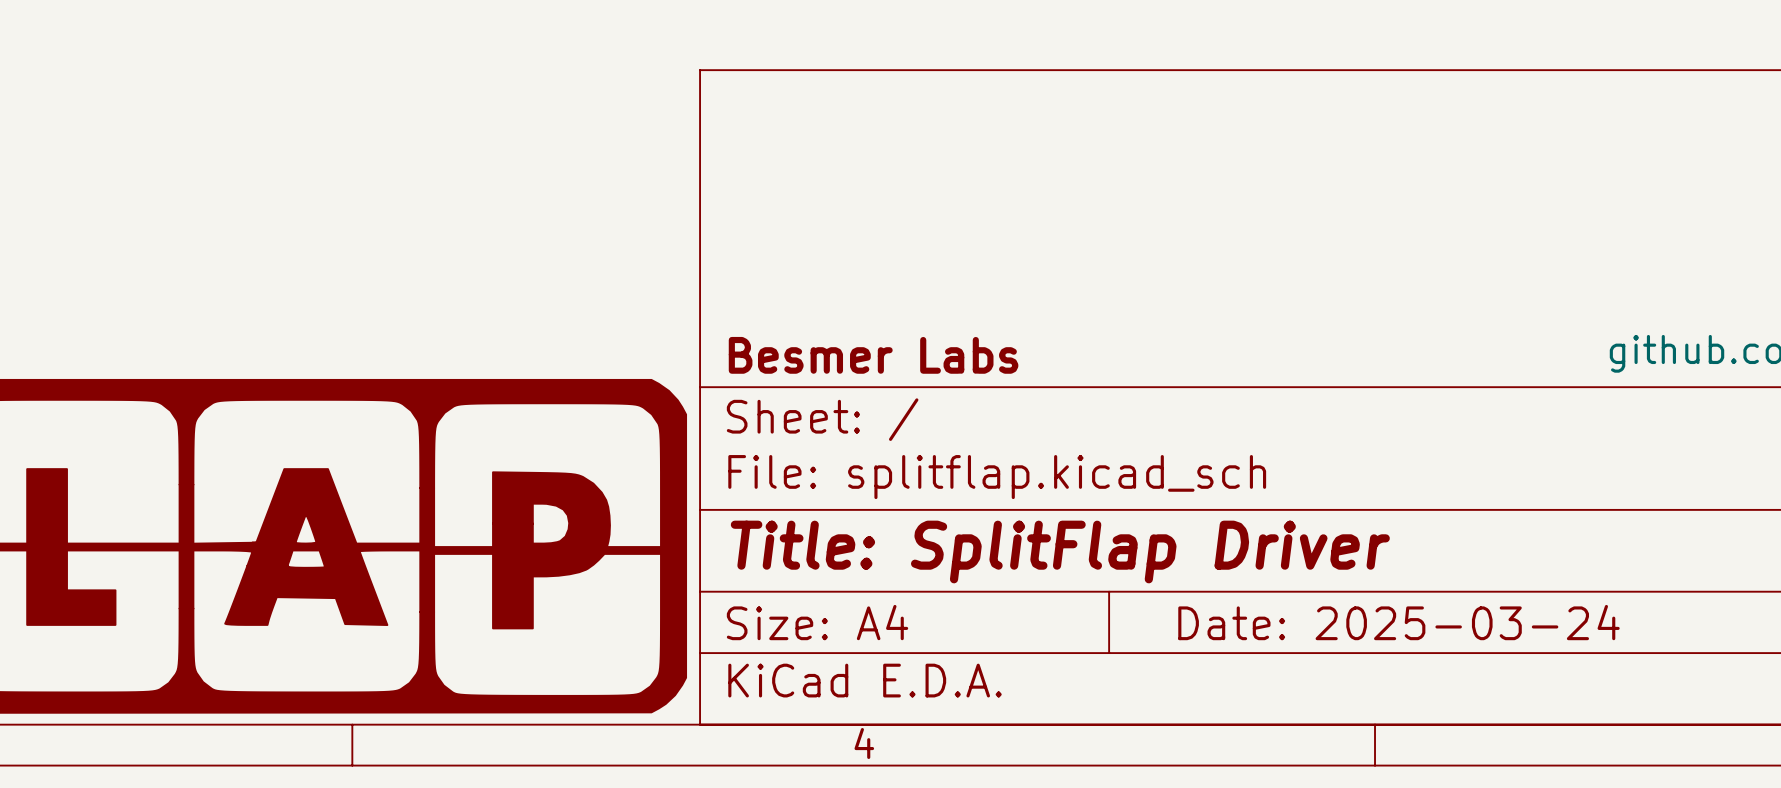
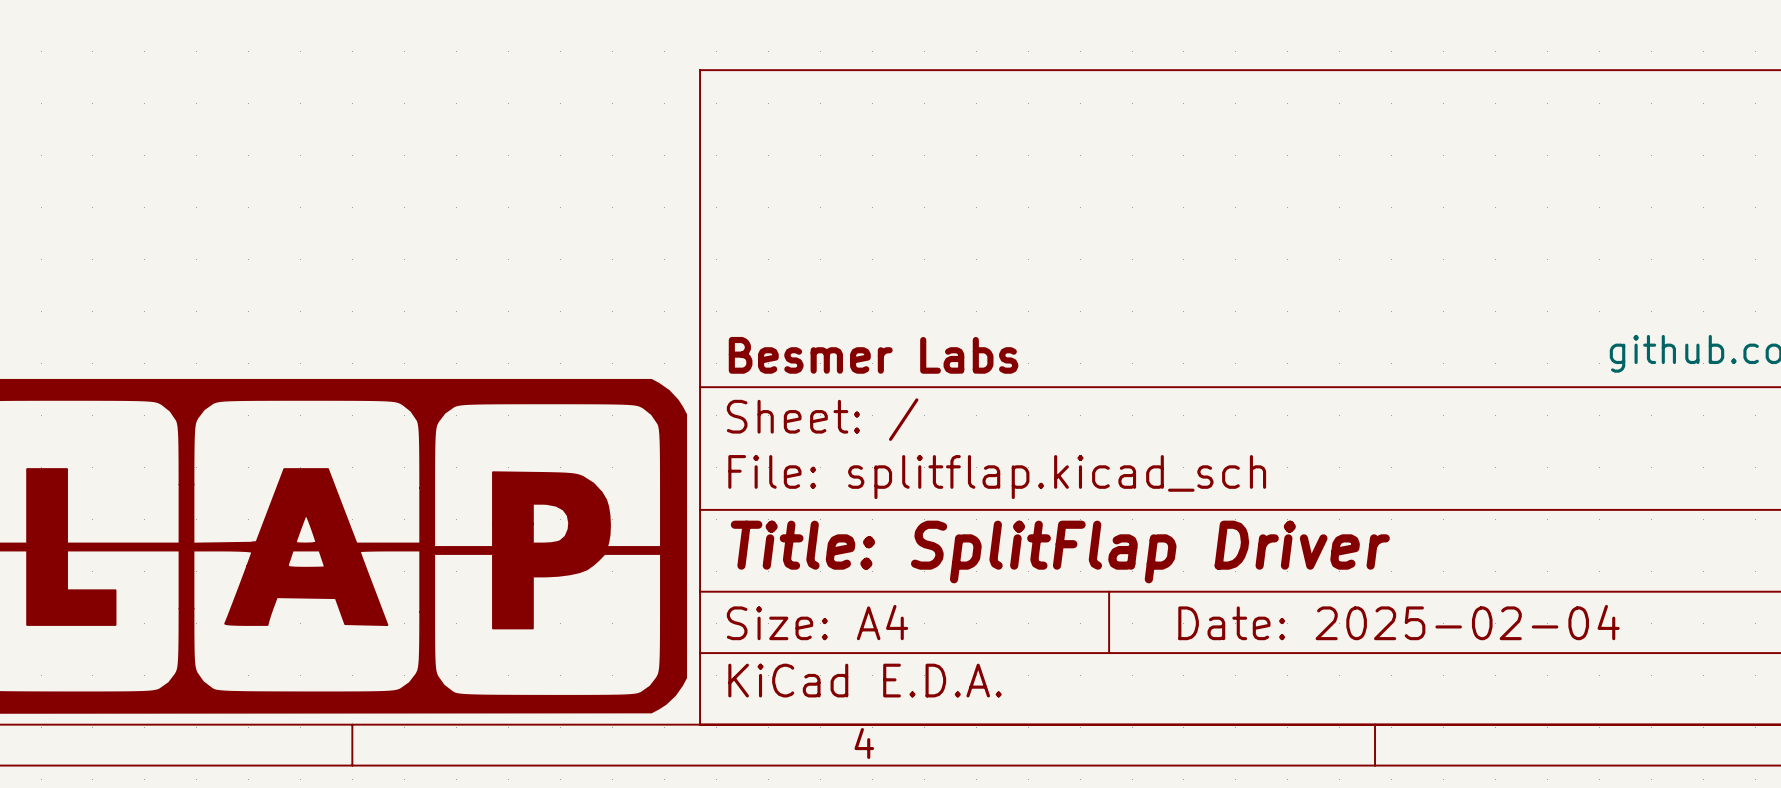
title block: Date: 2025-03-24 (1398, 622) -> Date: 2025-02-04 (1398, 622)

